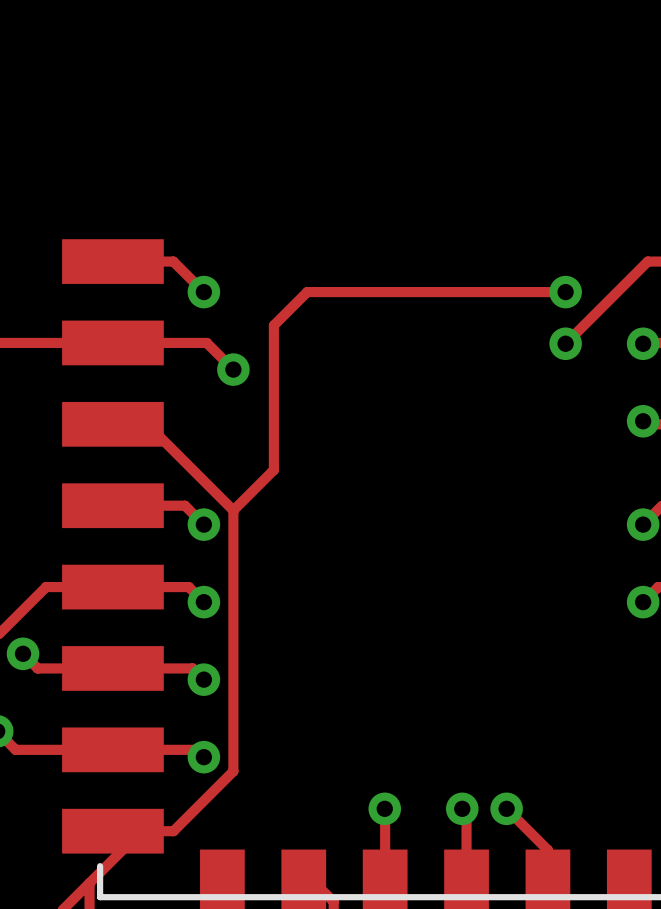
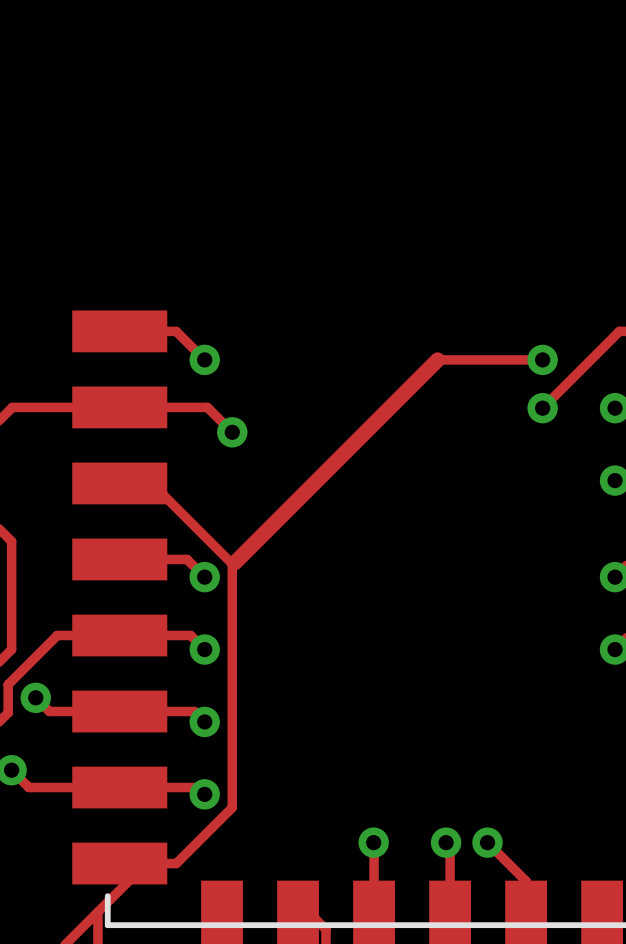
track: (453, 292) (307, 292) (273, 325) (273, 469) (233, 510) -> (437, 359) (235, 562)

